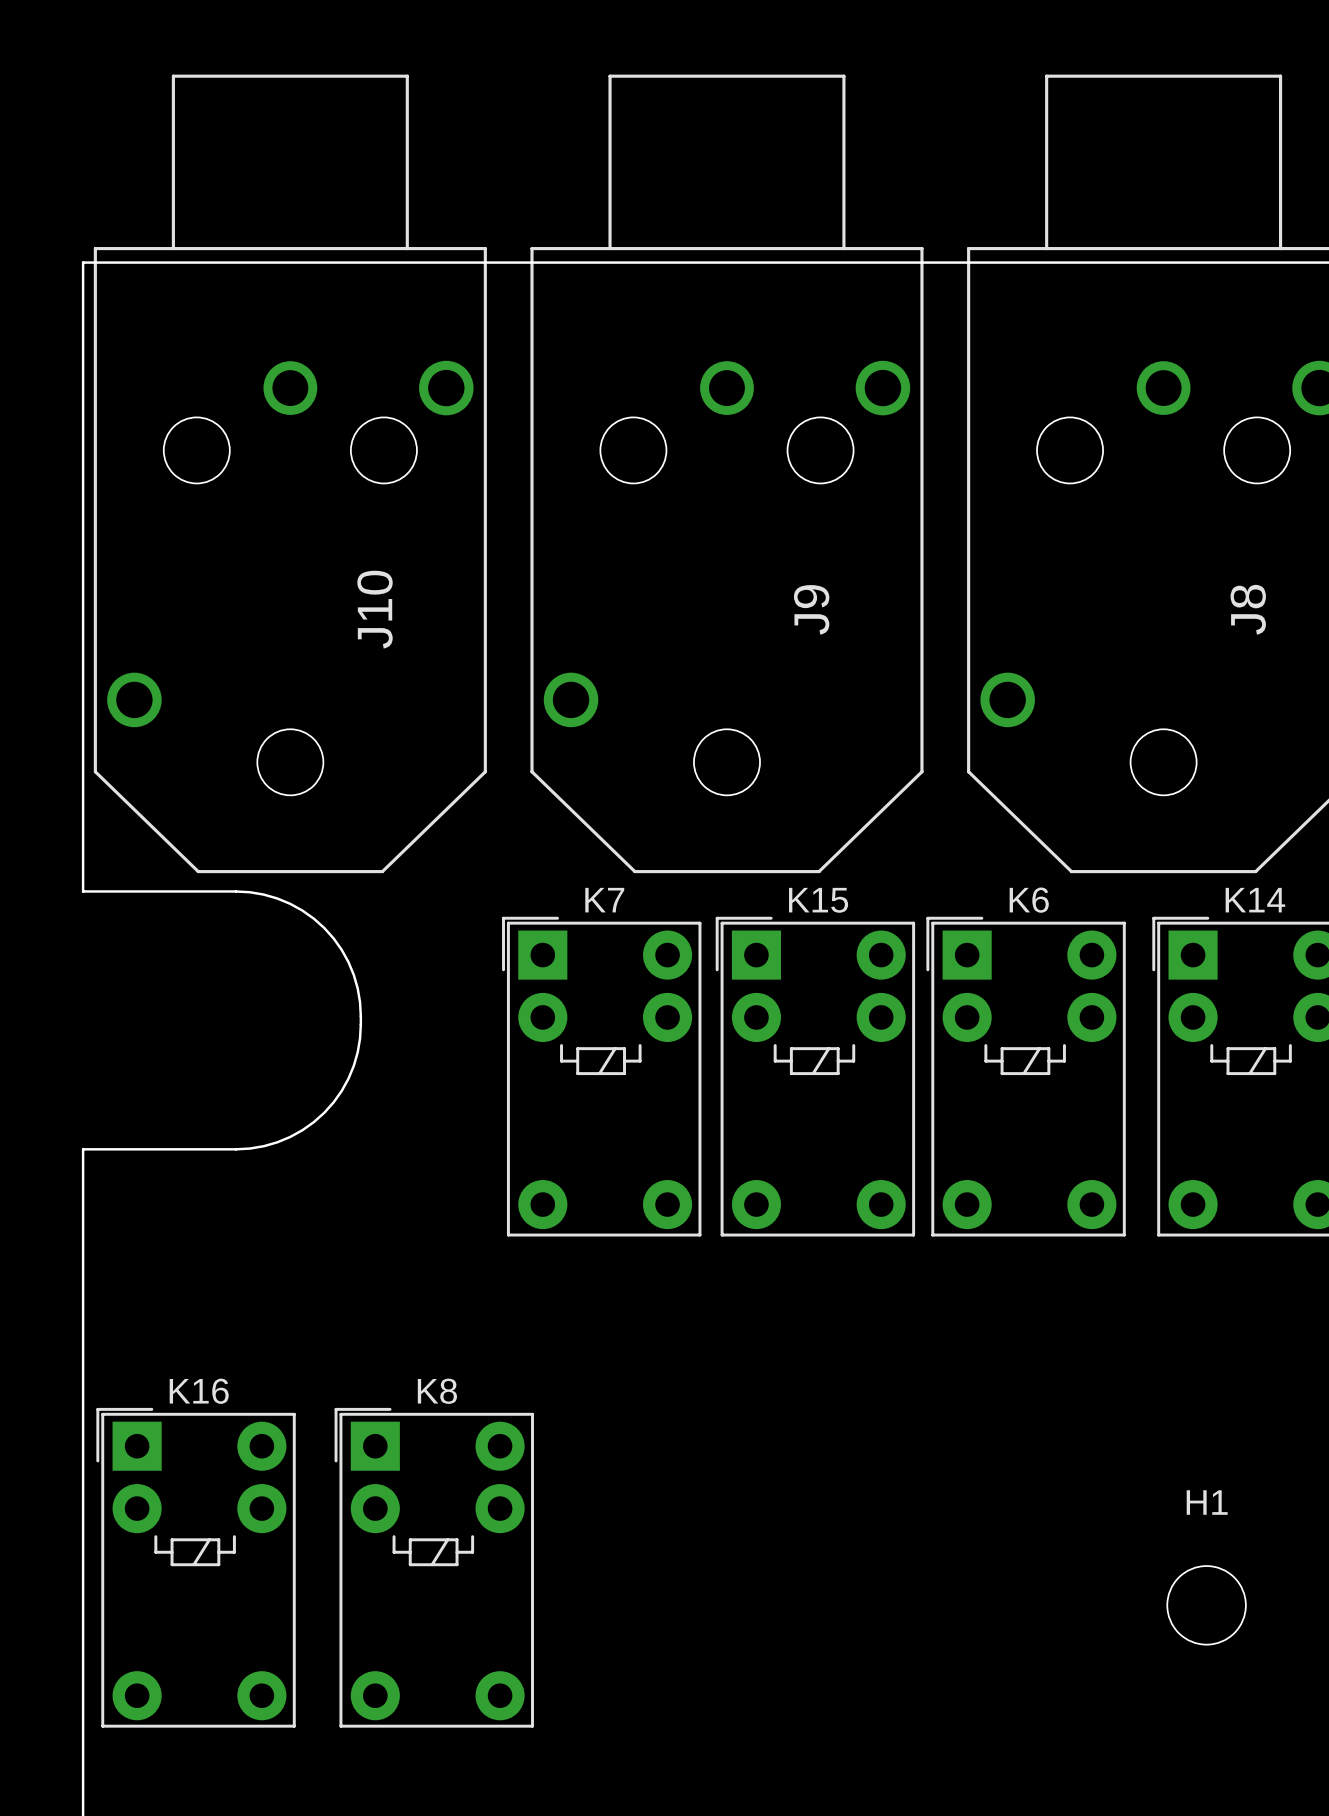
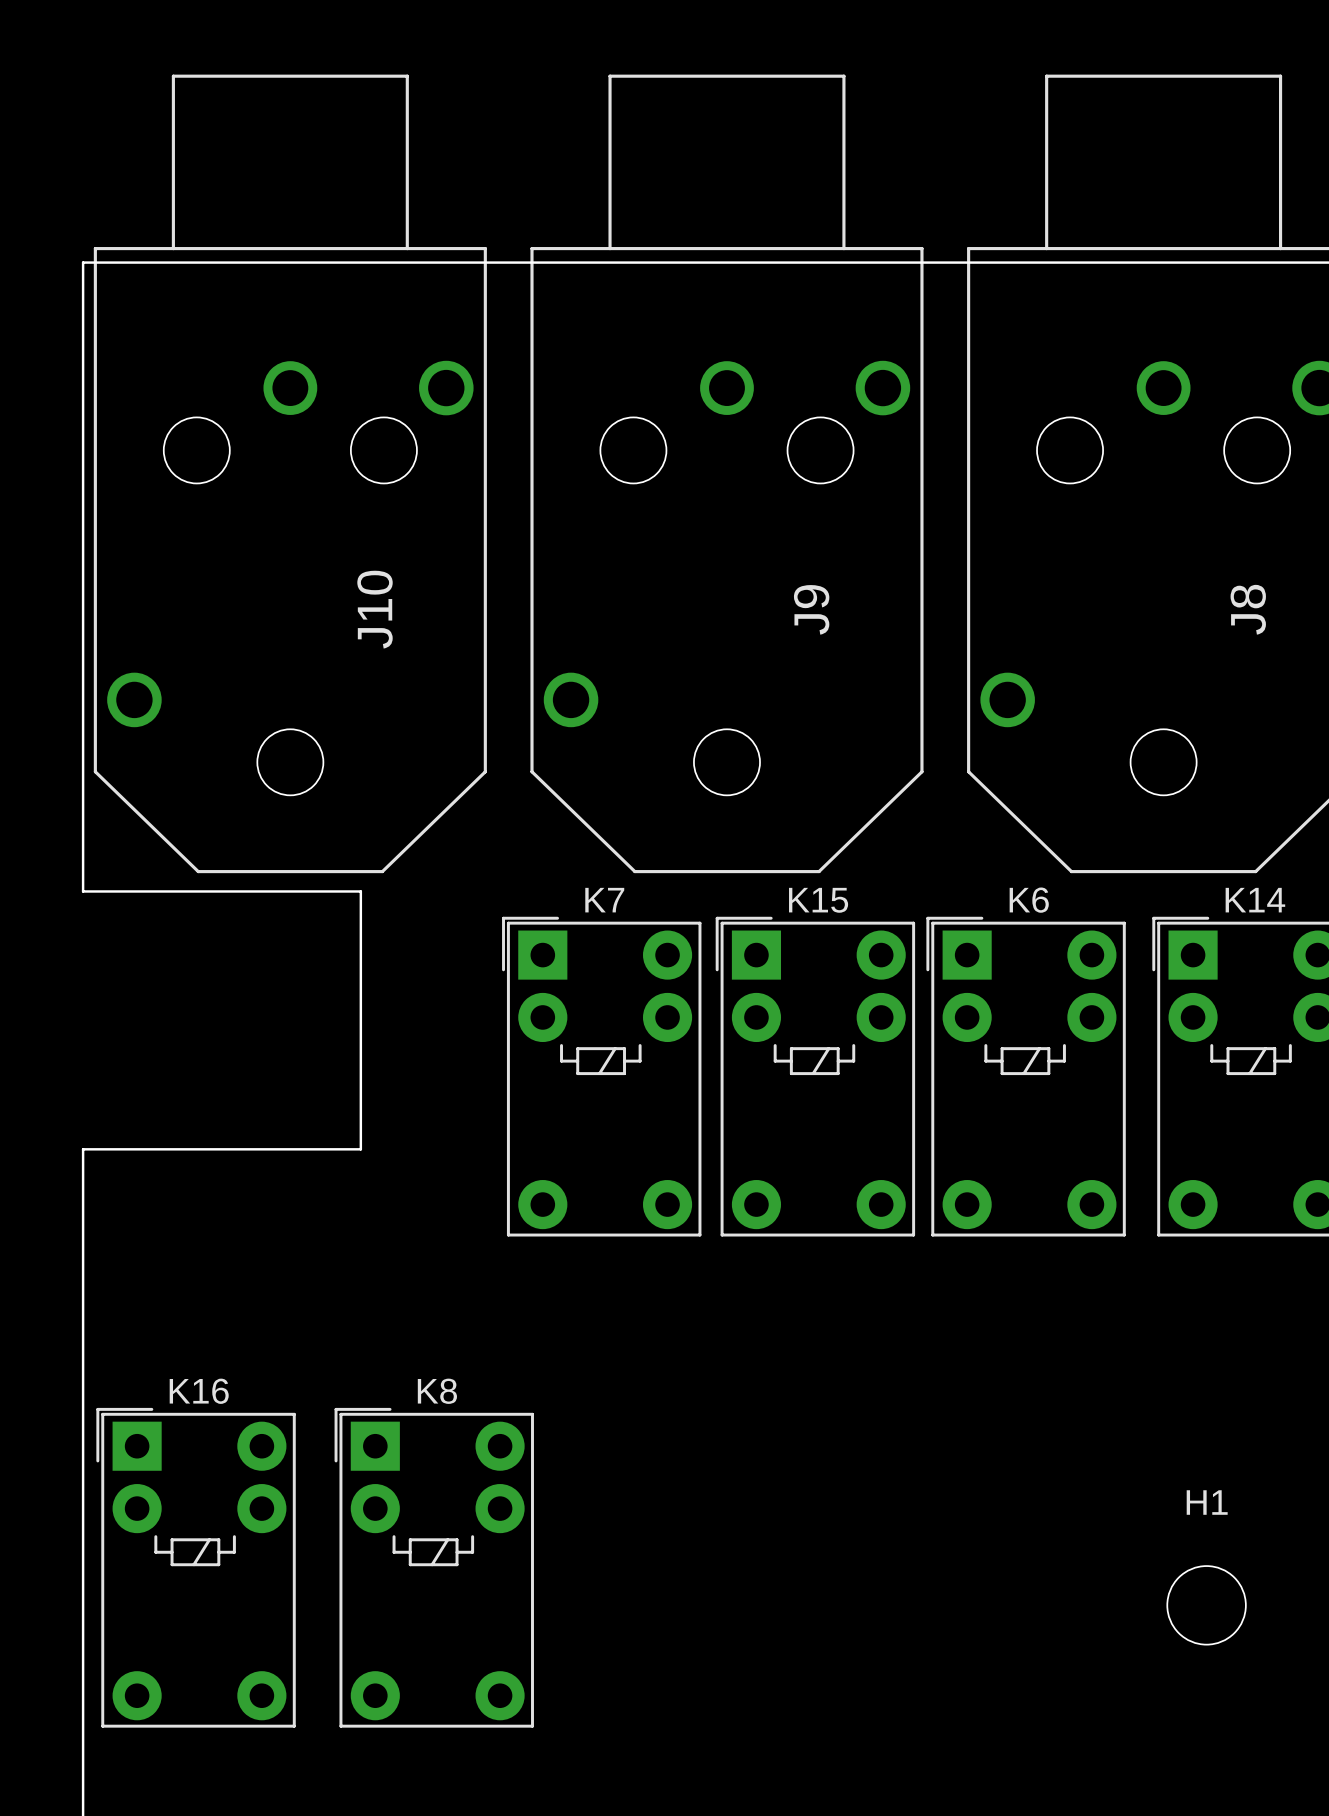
board edge: (236, 891) (263, 894) (277, 898) (302, 910) (324, 928) (341, 949) (348, 962) (357, 988) (360, 1016) -> (236, 891) (360, 891) (360, 1016)
board edge: (360, 1024) (357, 1052) (353, 1065) (341, 1090) (324, 1112) (313, 1122) (290, 1136) (263, 1146) (236, 1149) -> (360, 1024) (360, 1149) (236, 1149)

